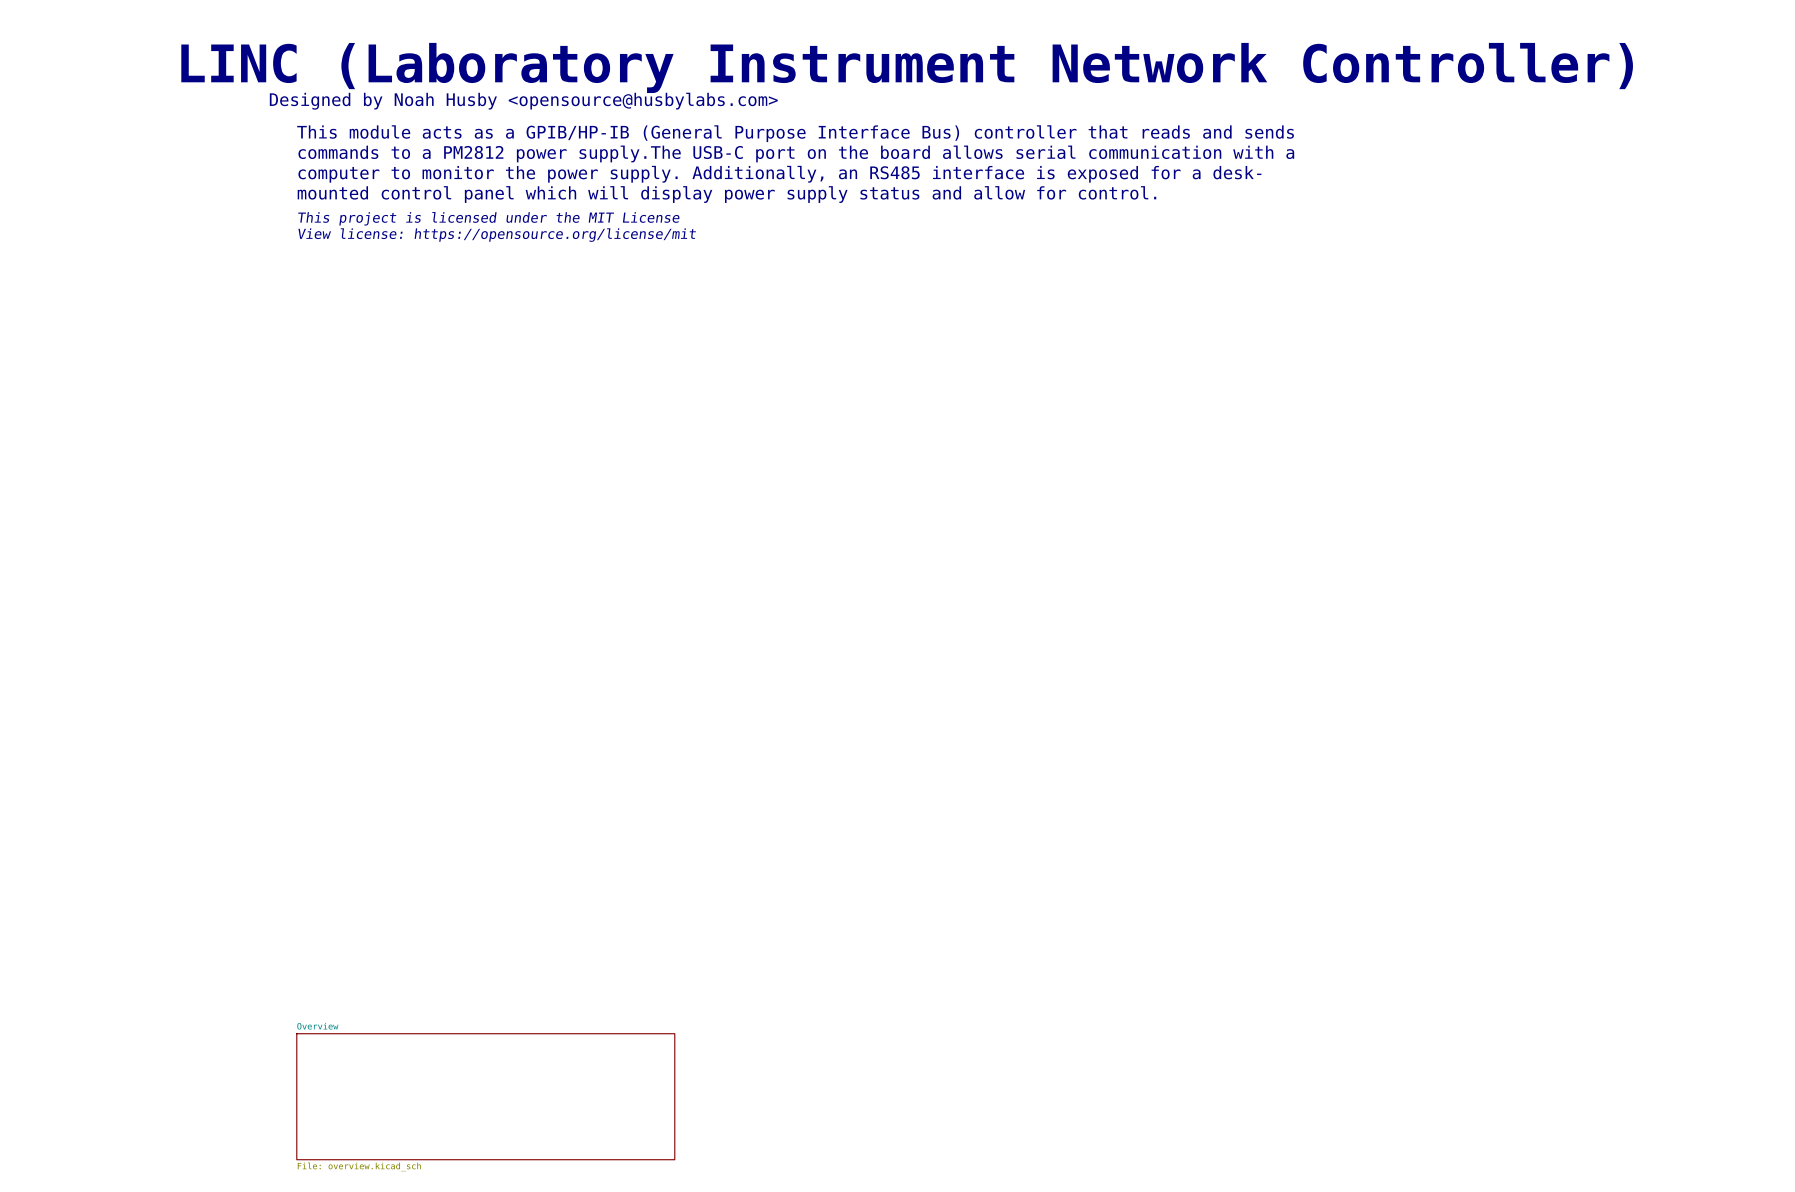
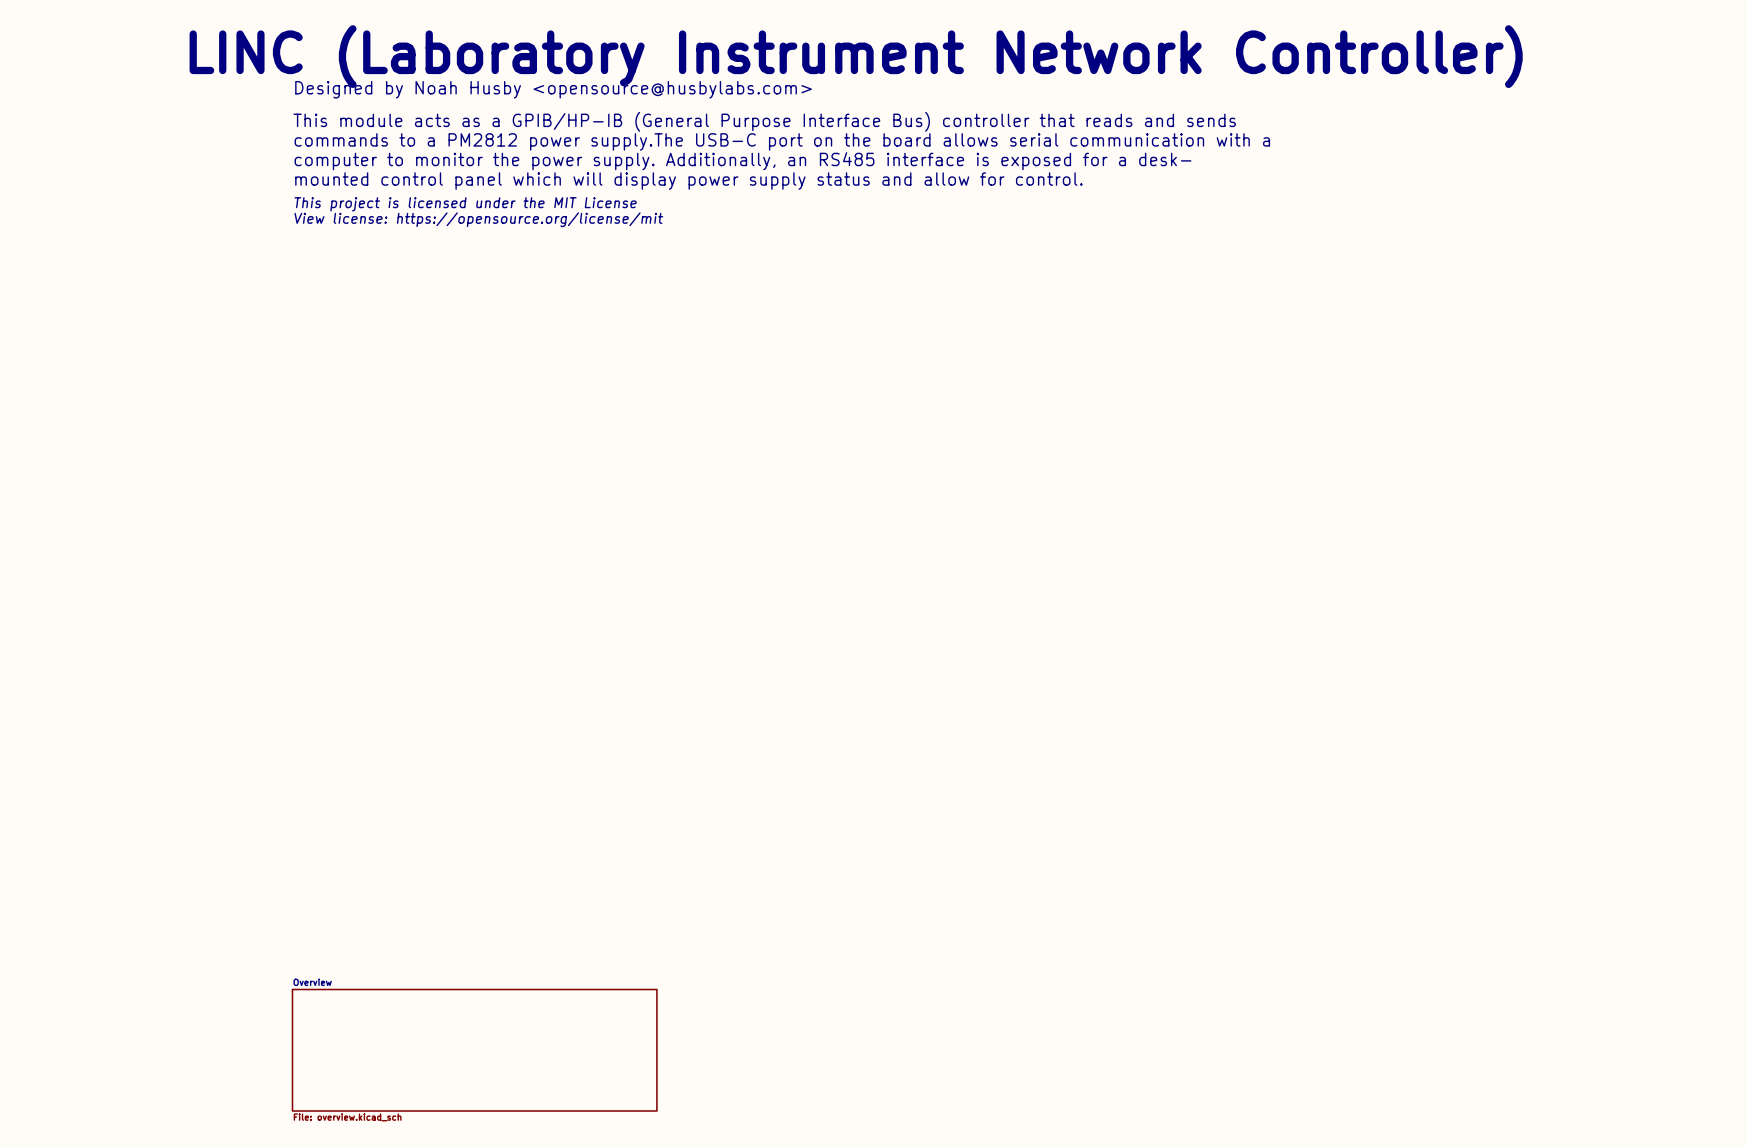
text position: LINC (Laboratory Instrument Network Controller) (907, 67) -> LINC (Laboratory Instrument Network Controller) (856, 56)
text: none -> Designed by Noah Husby <opensource@husbylabs.com> (553, 89)
text: Designed by Noah Husby <opensource@husbylabs.com> (523, 101) -> none

